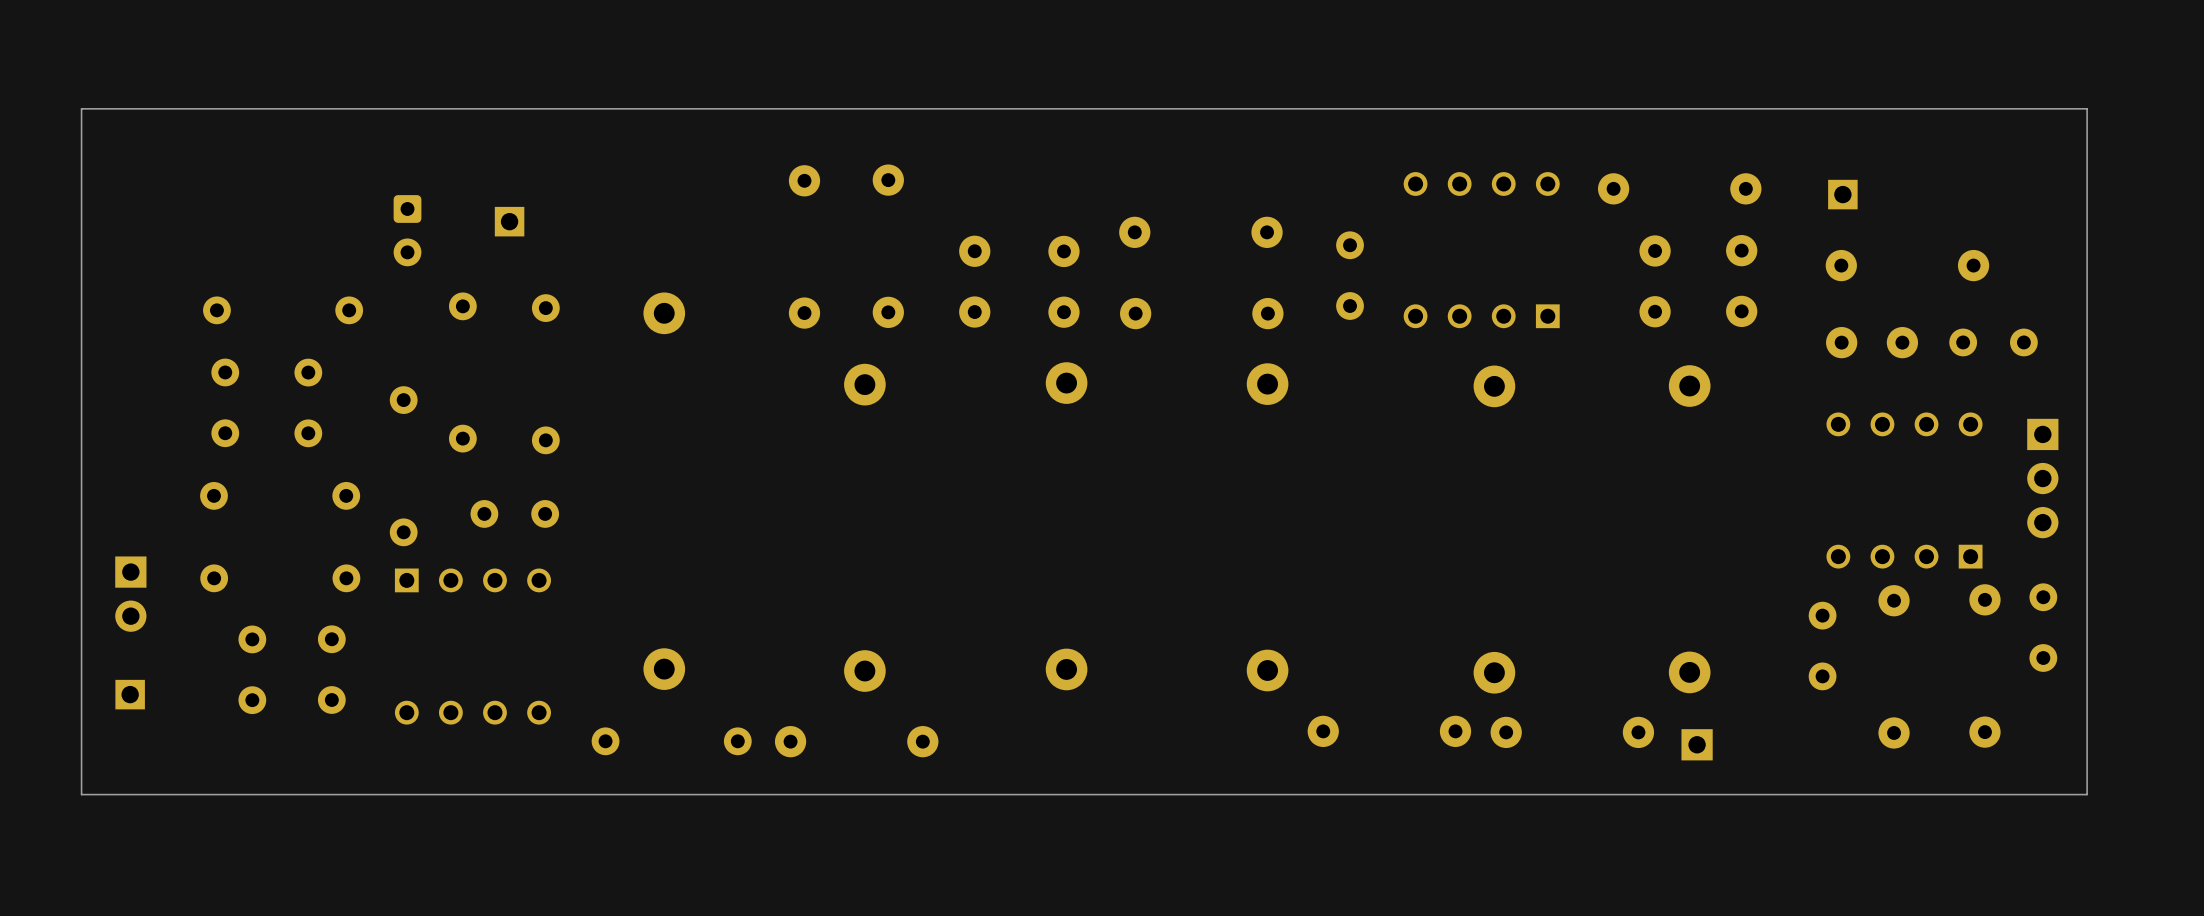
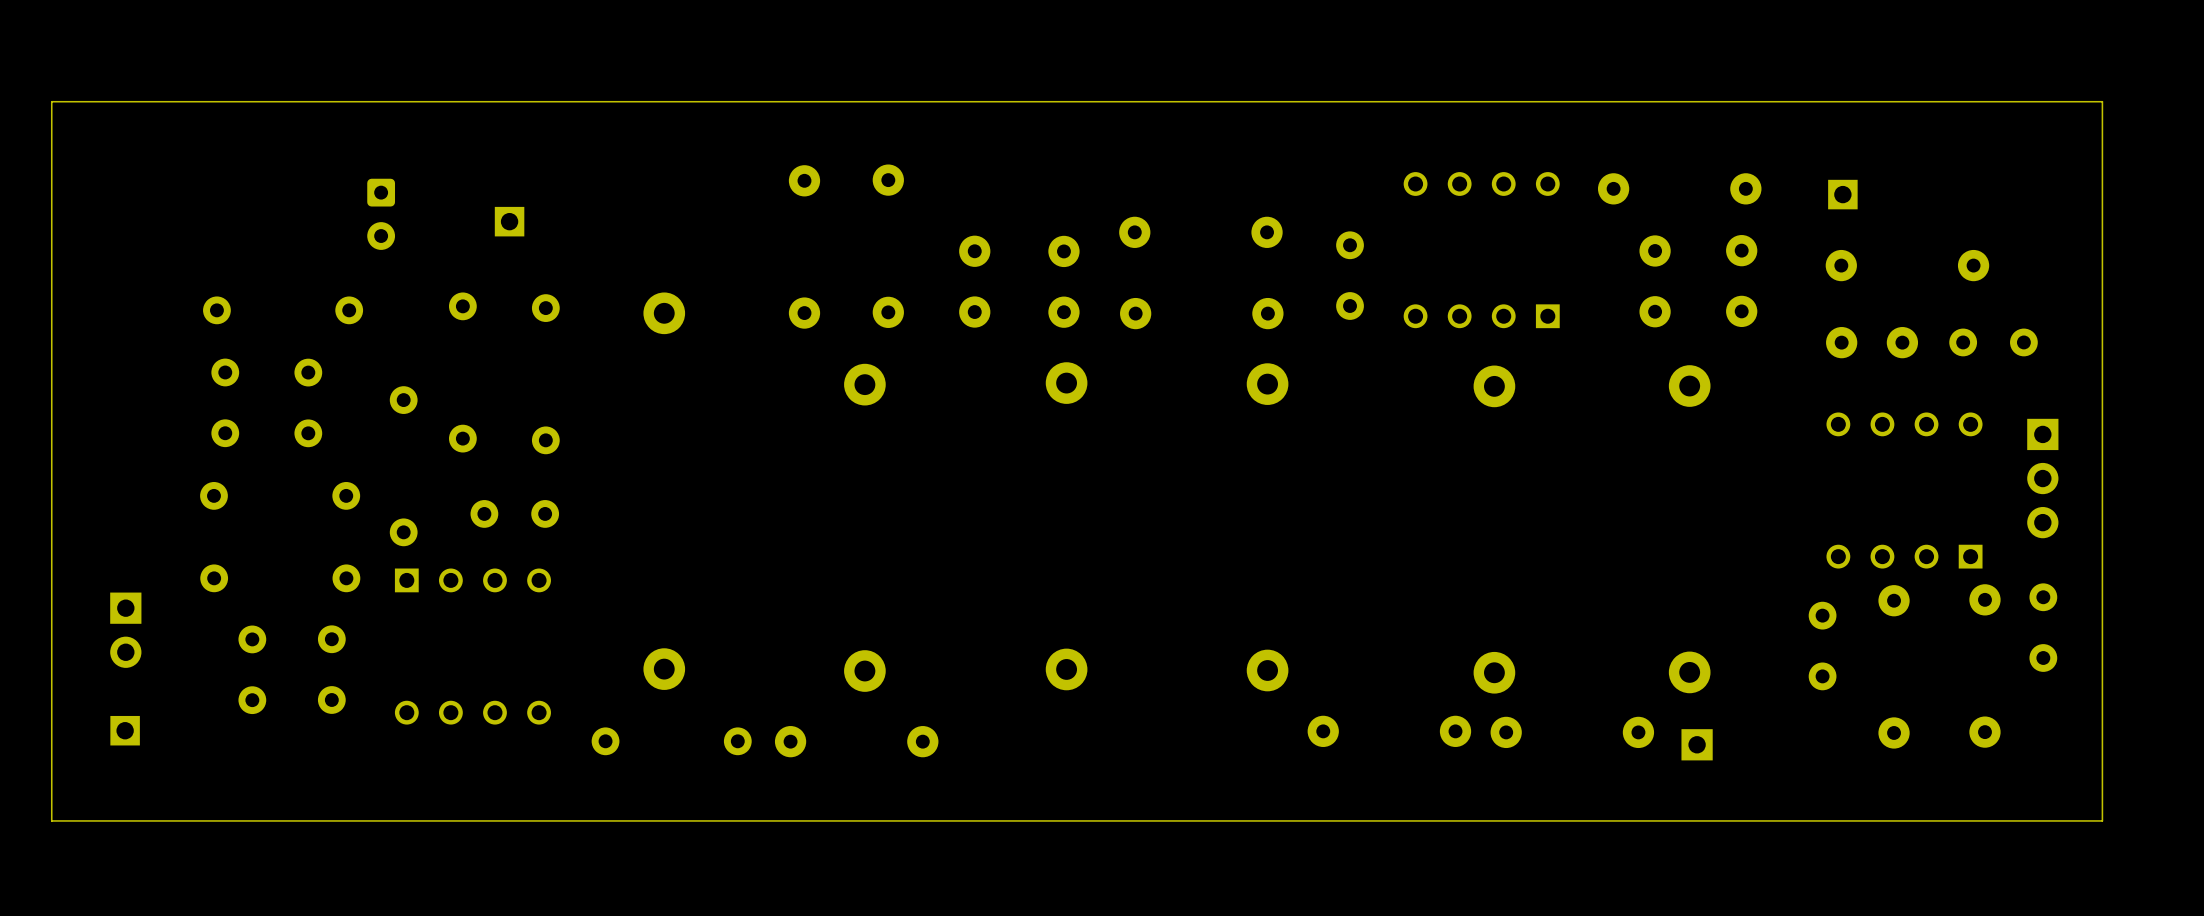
board edge: (2087, 108) (81, 108) (81, 794) (2087, 794) (2087, 108) -> (2102, 101) (2102, 820) (51, 820) (51, 101) (2102, 101)
part position: (407, 230) -> (381, 214)
part position: (130, 594) -> (125, 630)
part position: (130, 694) -> (125, 730)

